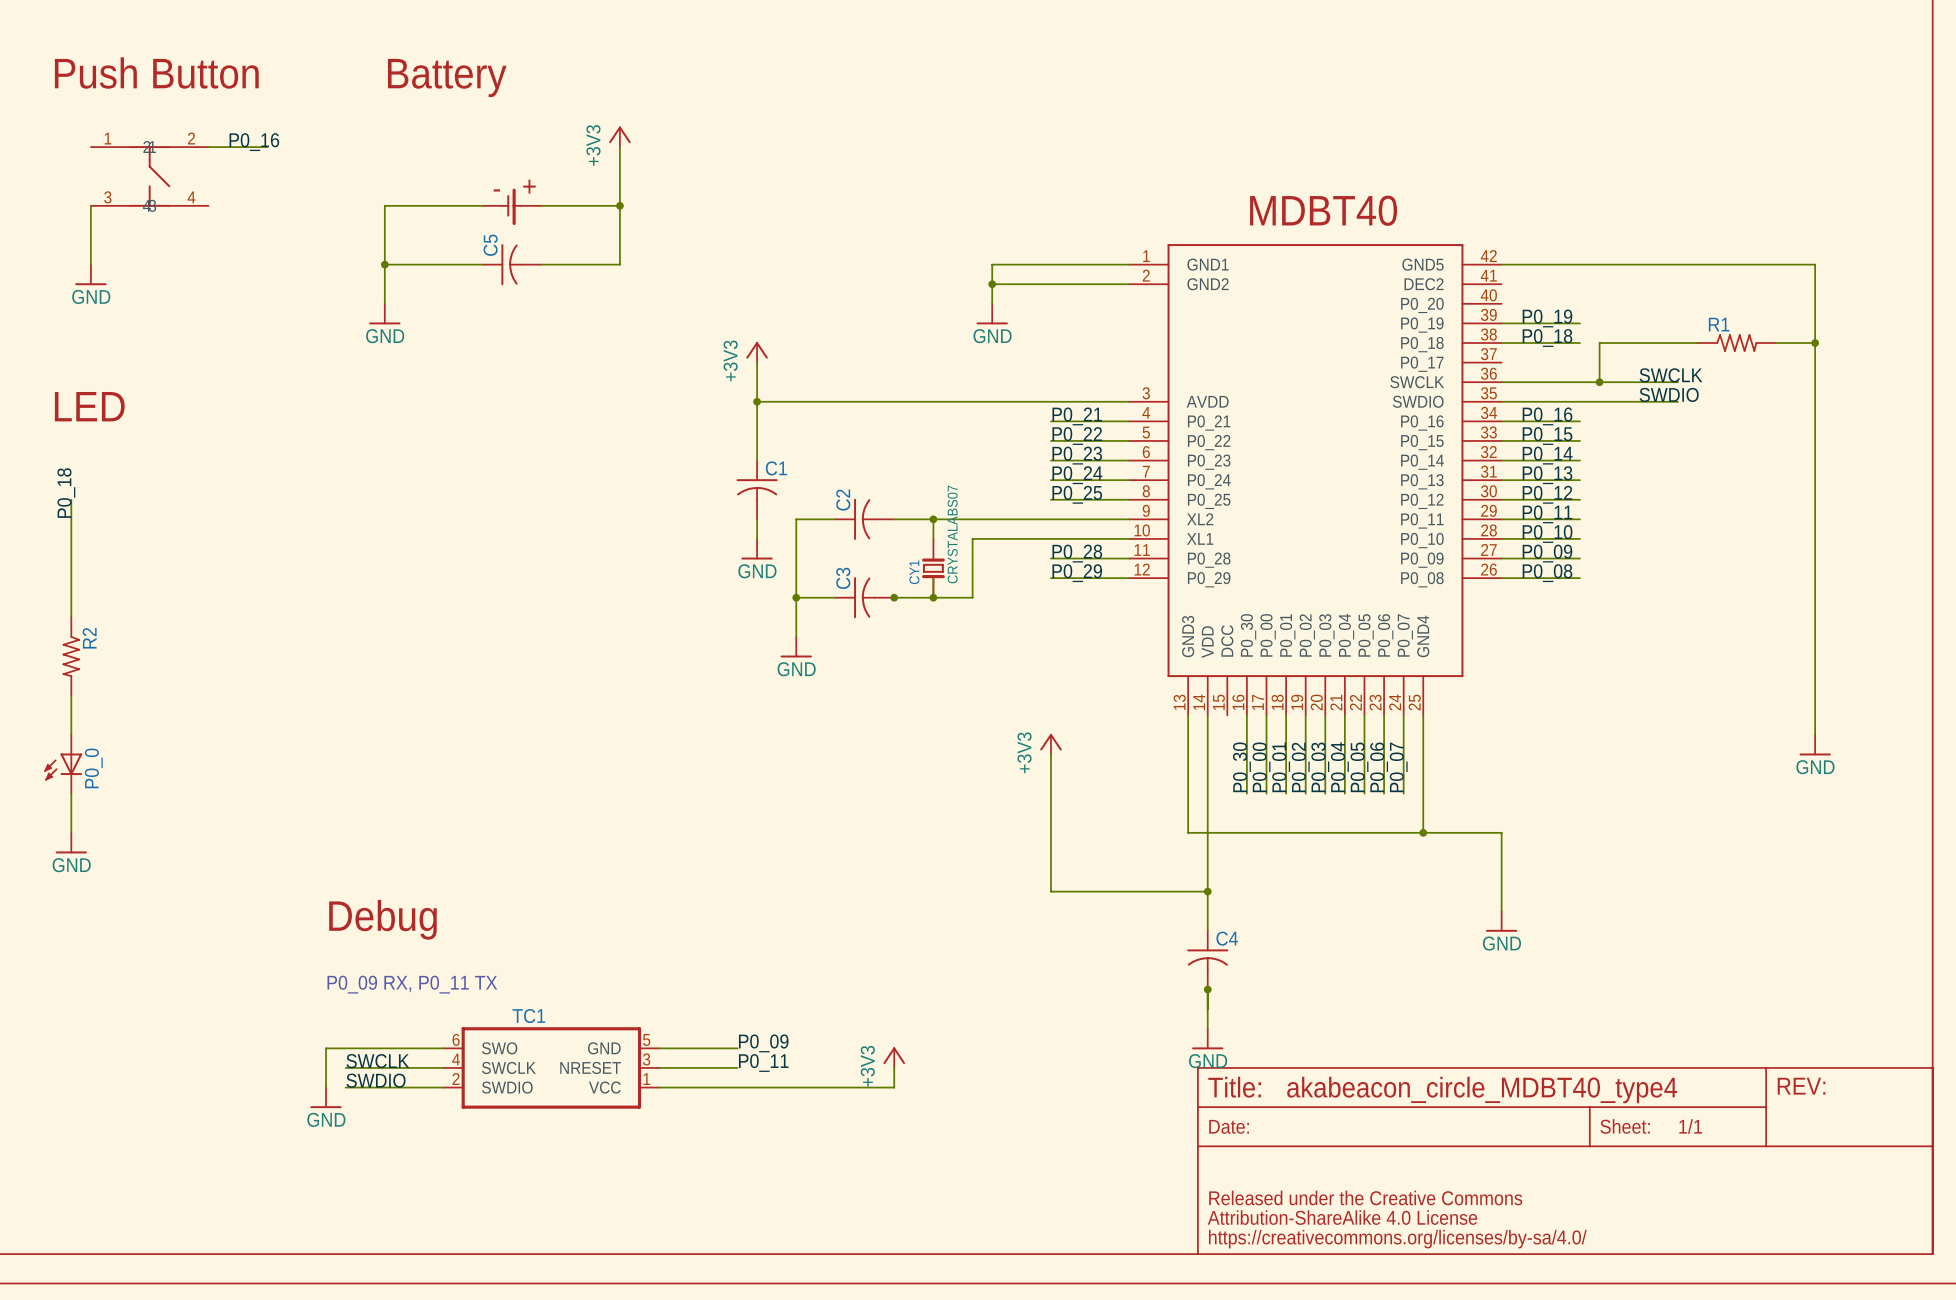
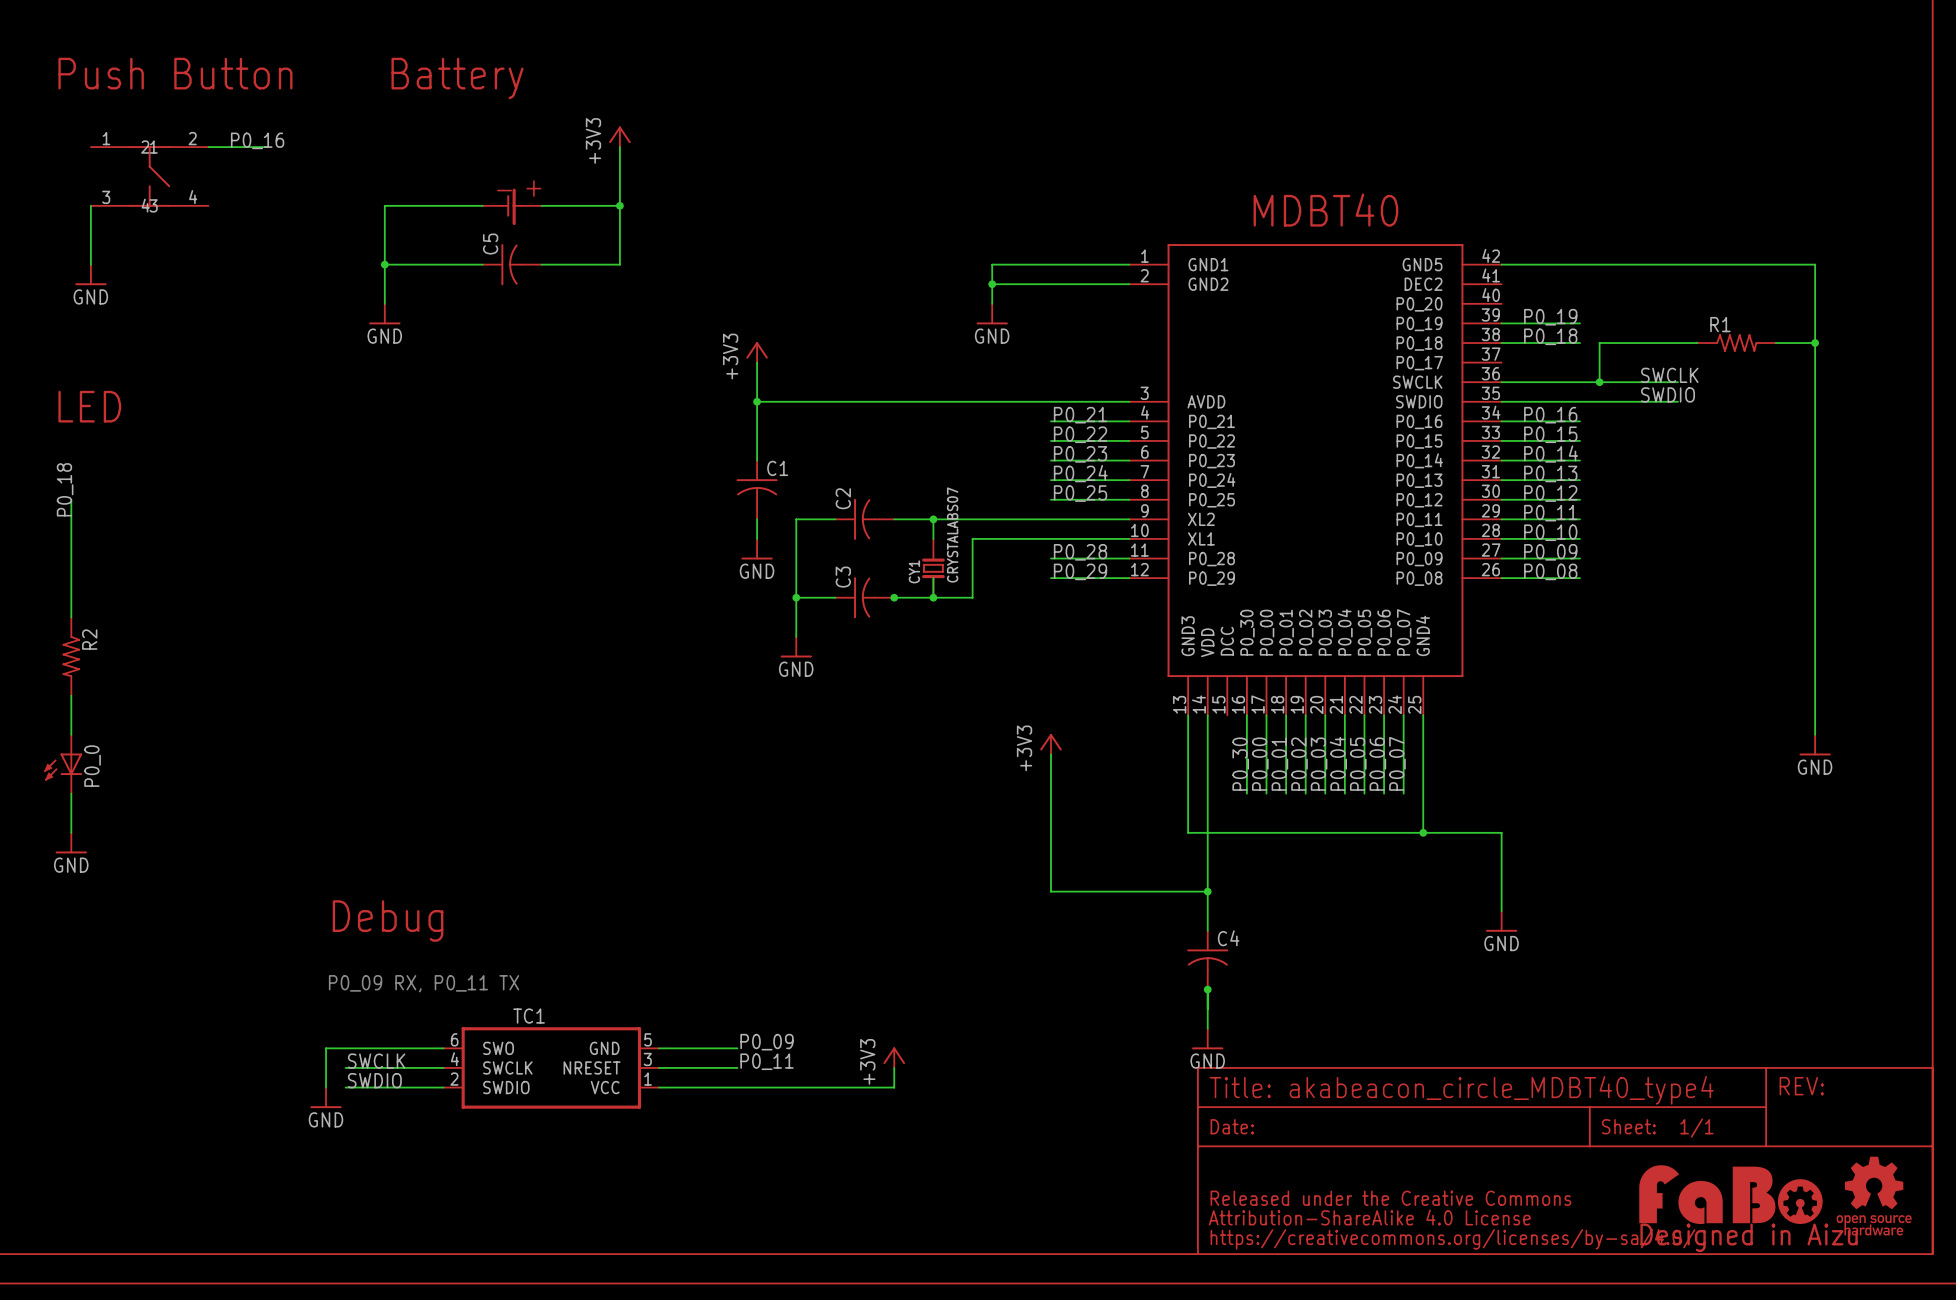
part: none -> (1730, 1194)
part: none -> (1874, 1196)

